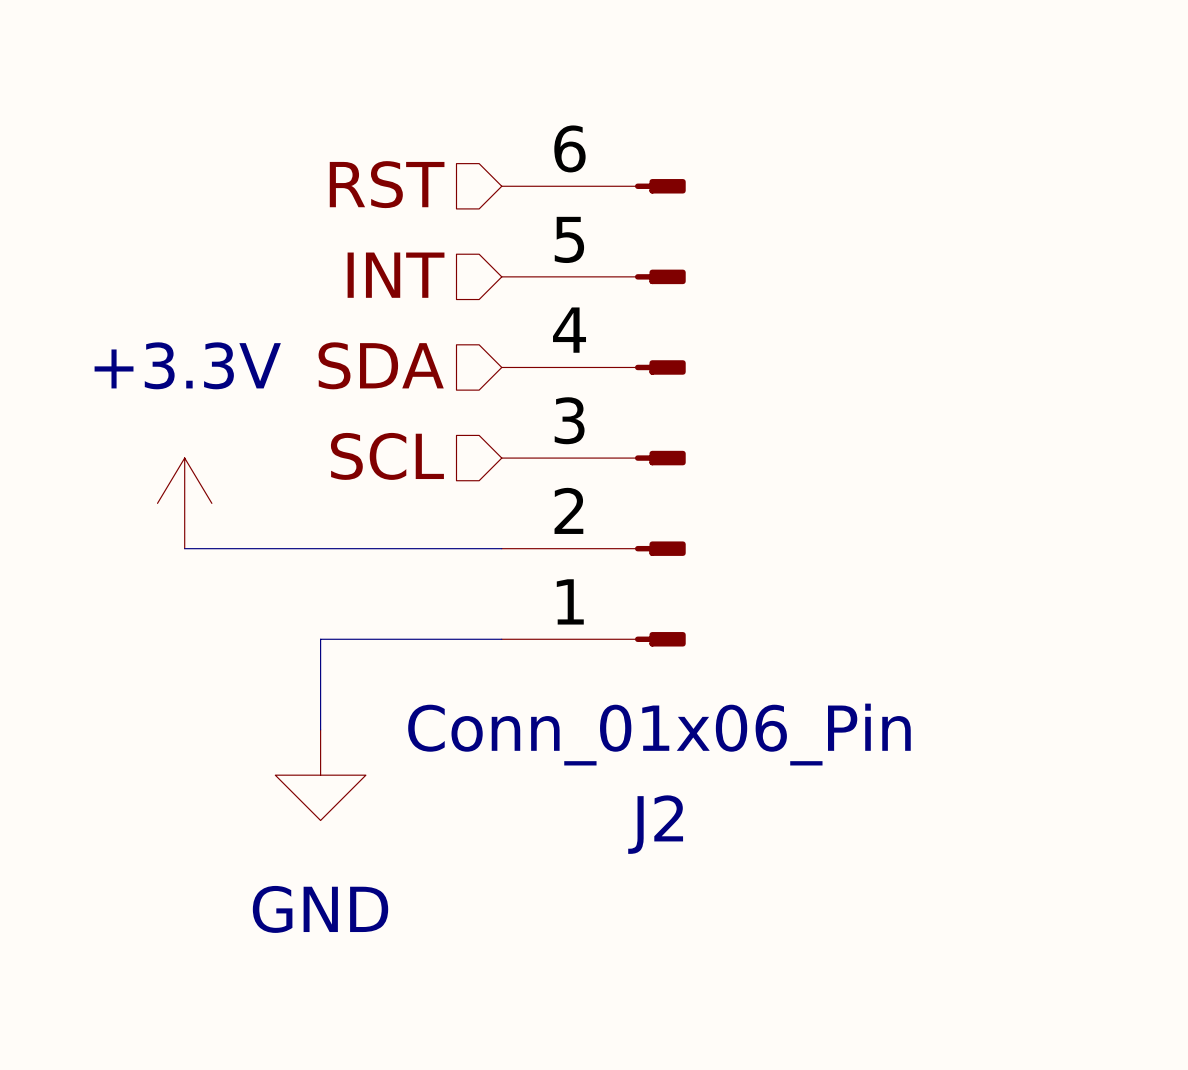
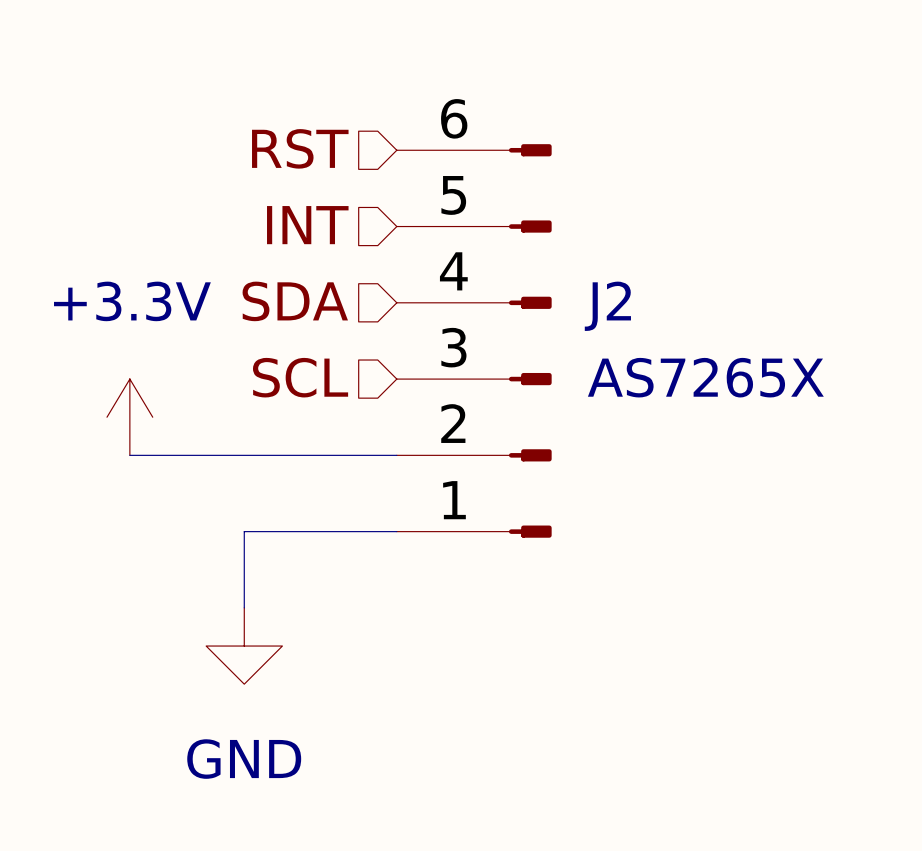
J2 value: Conn_01x06_Pin (659, 734) -> AS7265X (705, 377)
J2 name position: J2 (655, 824) -> J2 (607, 306)

